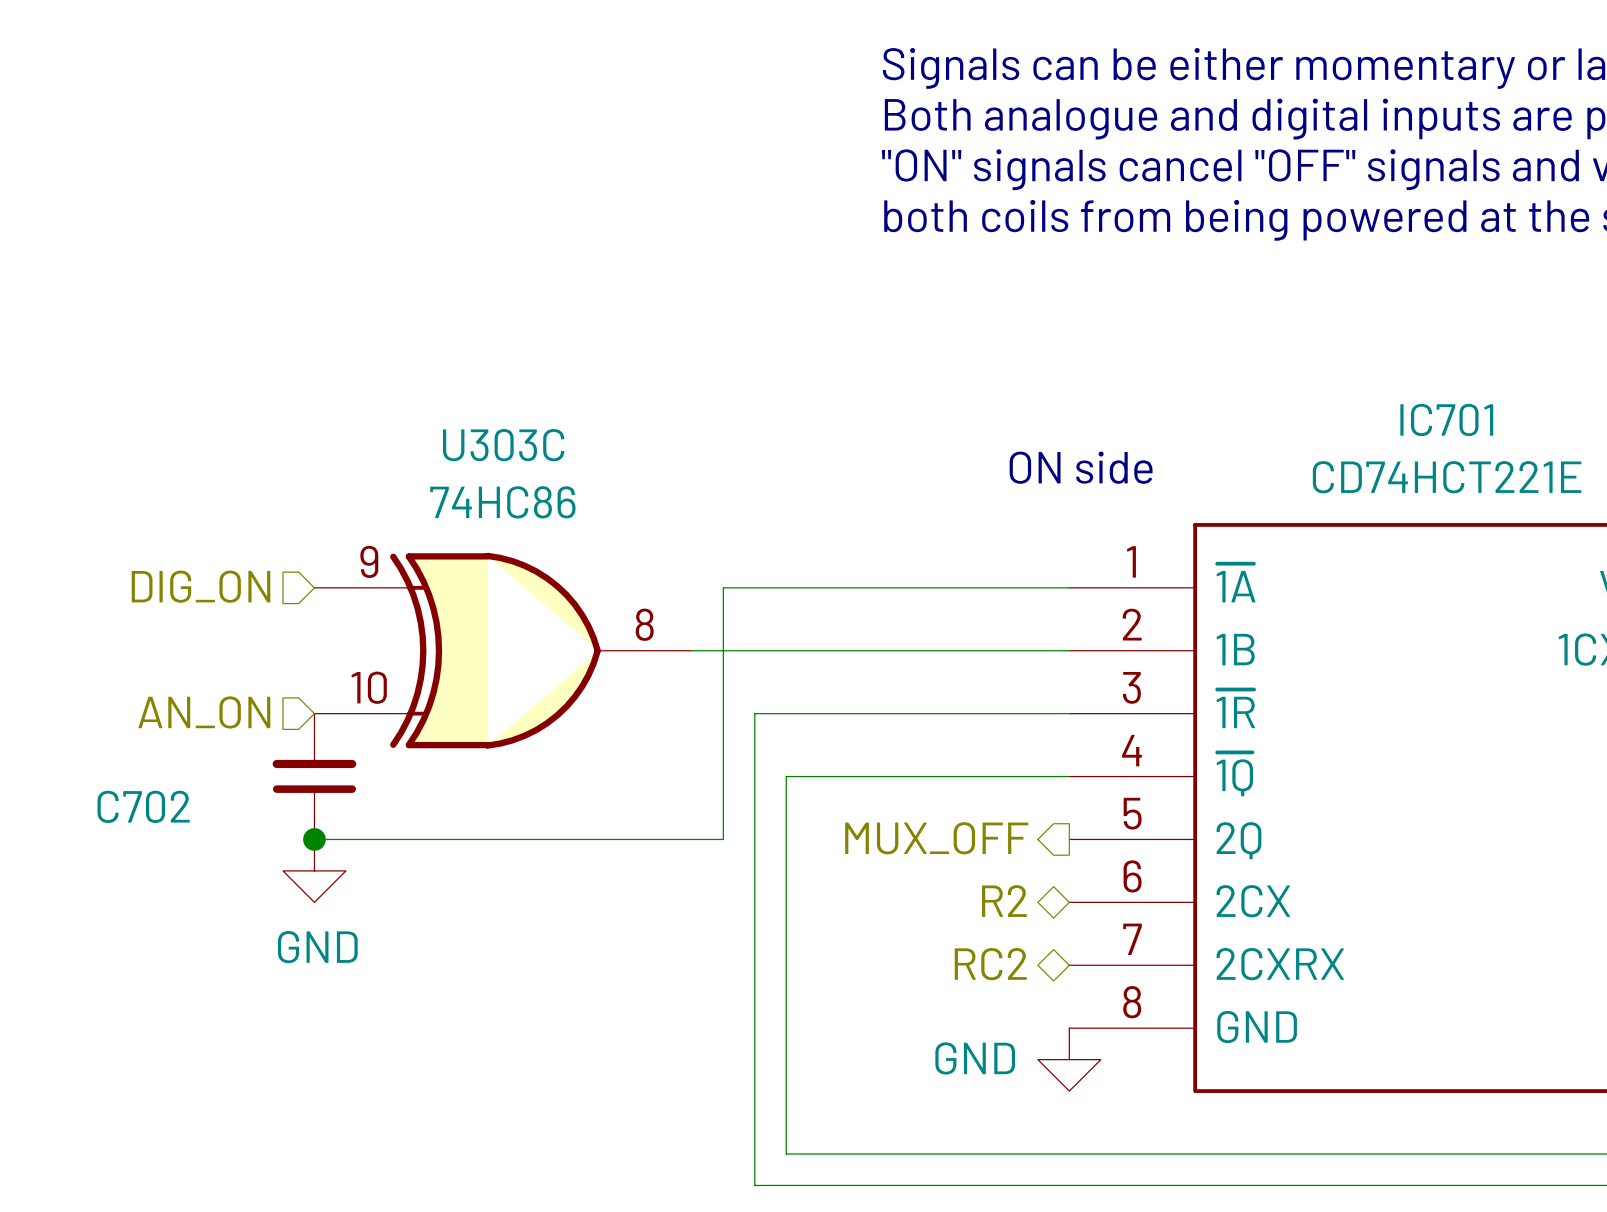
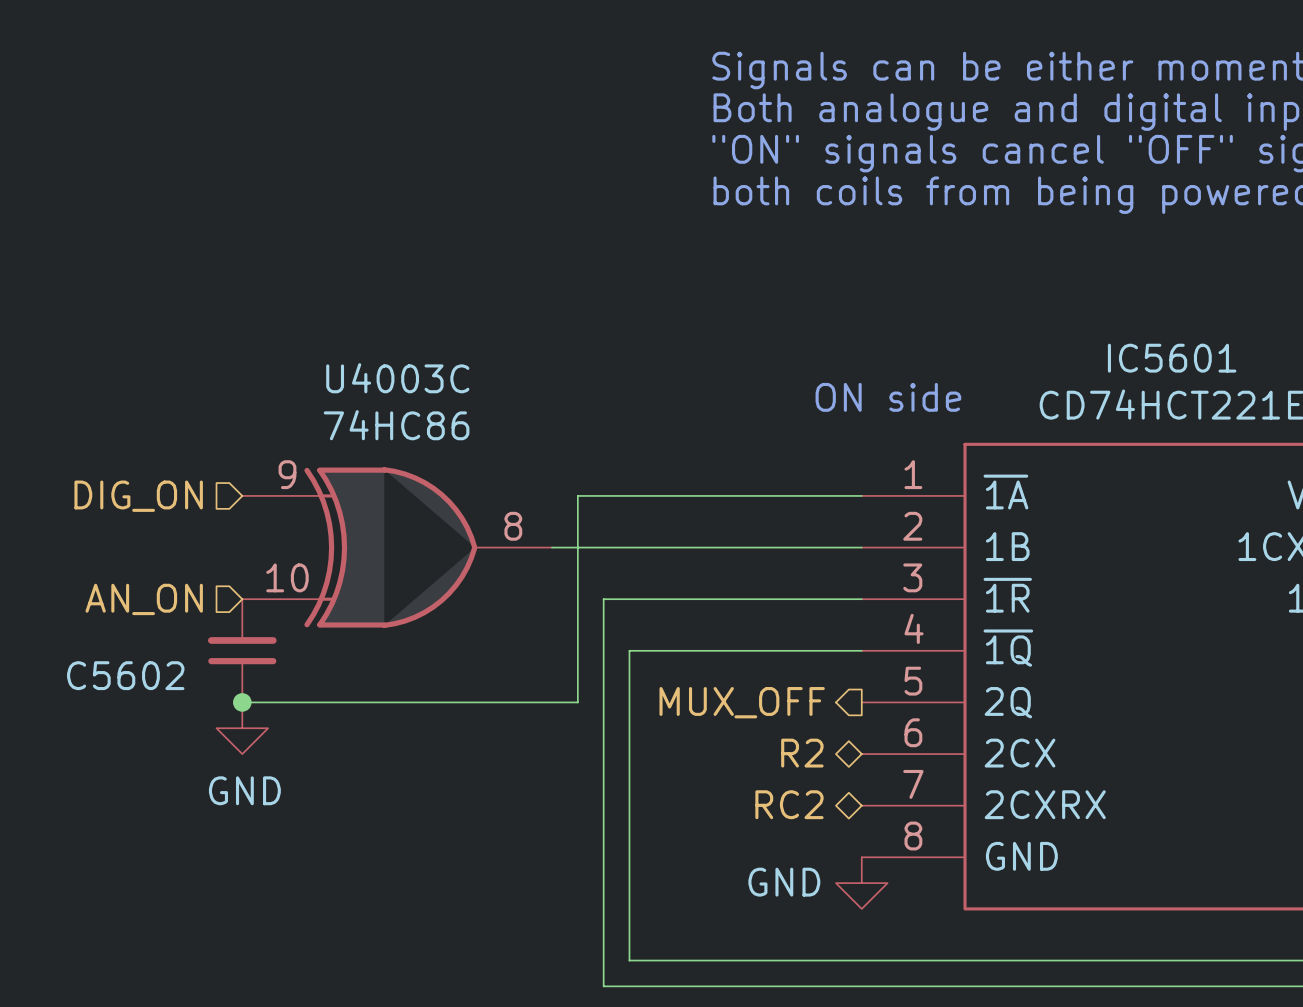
IC701 name: IC701 (1446, 419) -> IC5601 (1172, 358)
U303C name: U303C (503, 445) -> U4003C (397, 378)
C702 name: C702 (143, 806) -> C5602 (125, 675)

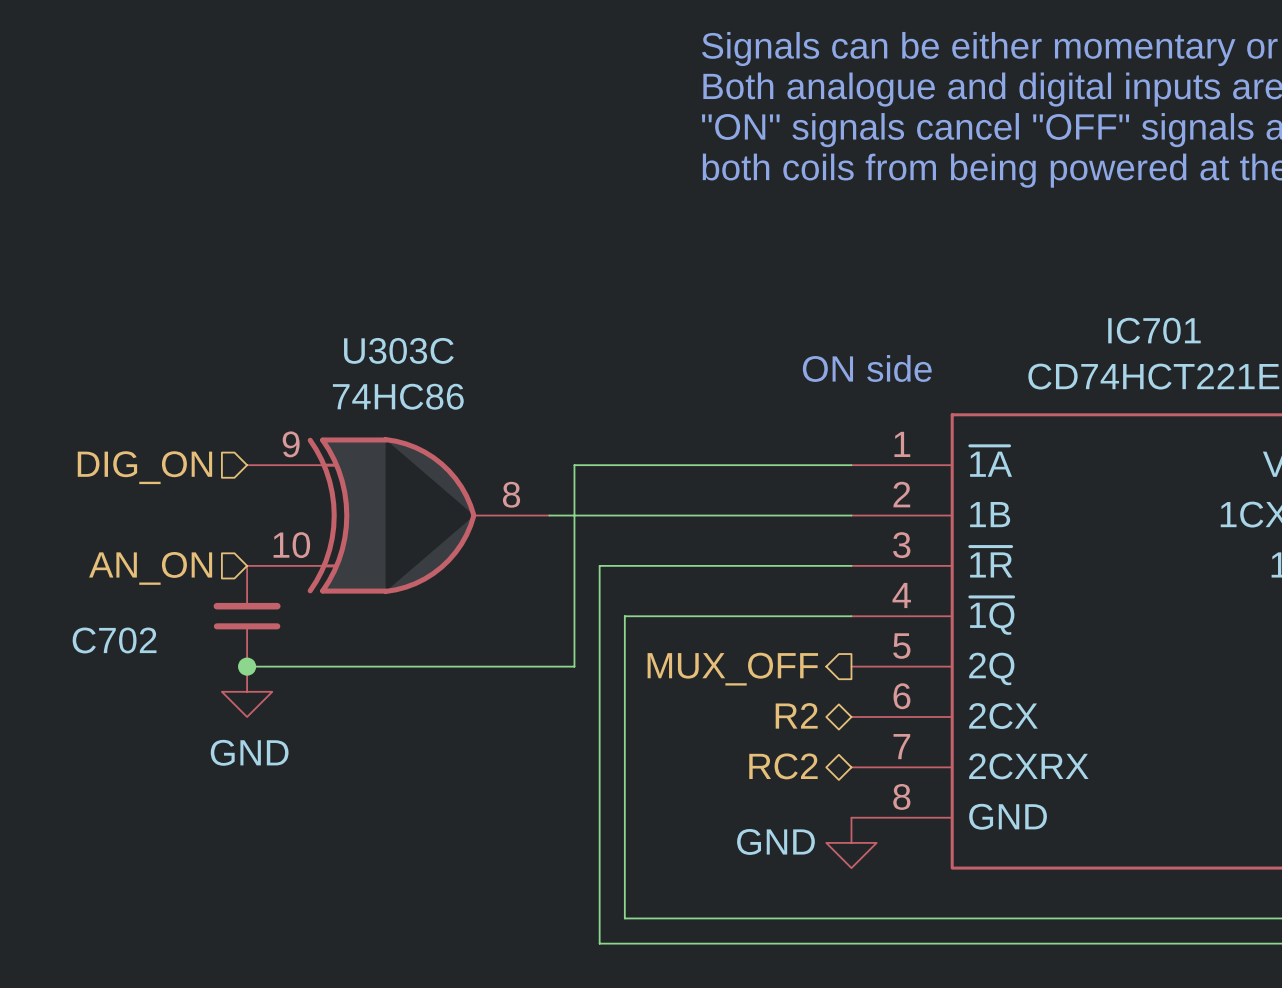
IC5601 name: IC5601 (1172, 358) -> IC701 (1154, 330)
U4003C name: U4003C (397, 378) -> U303C (398, 350)
C5602 name: C5602 (125, 675) -> C702 (114, 640)

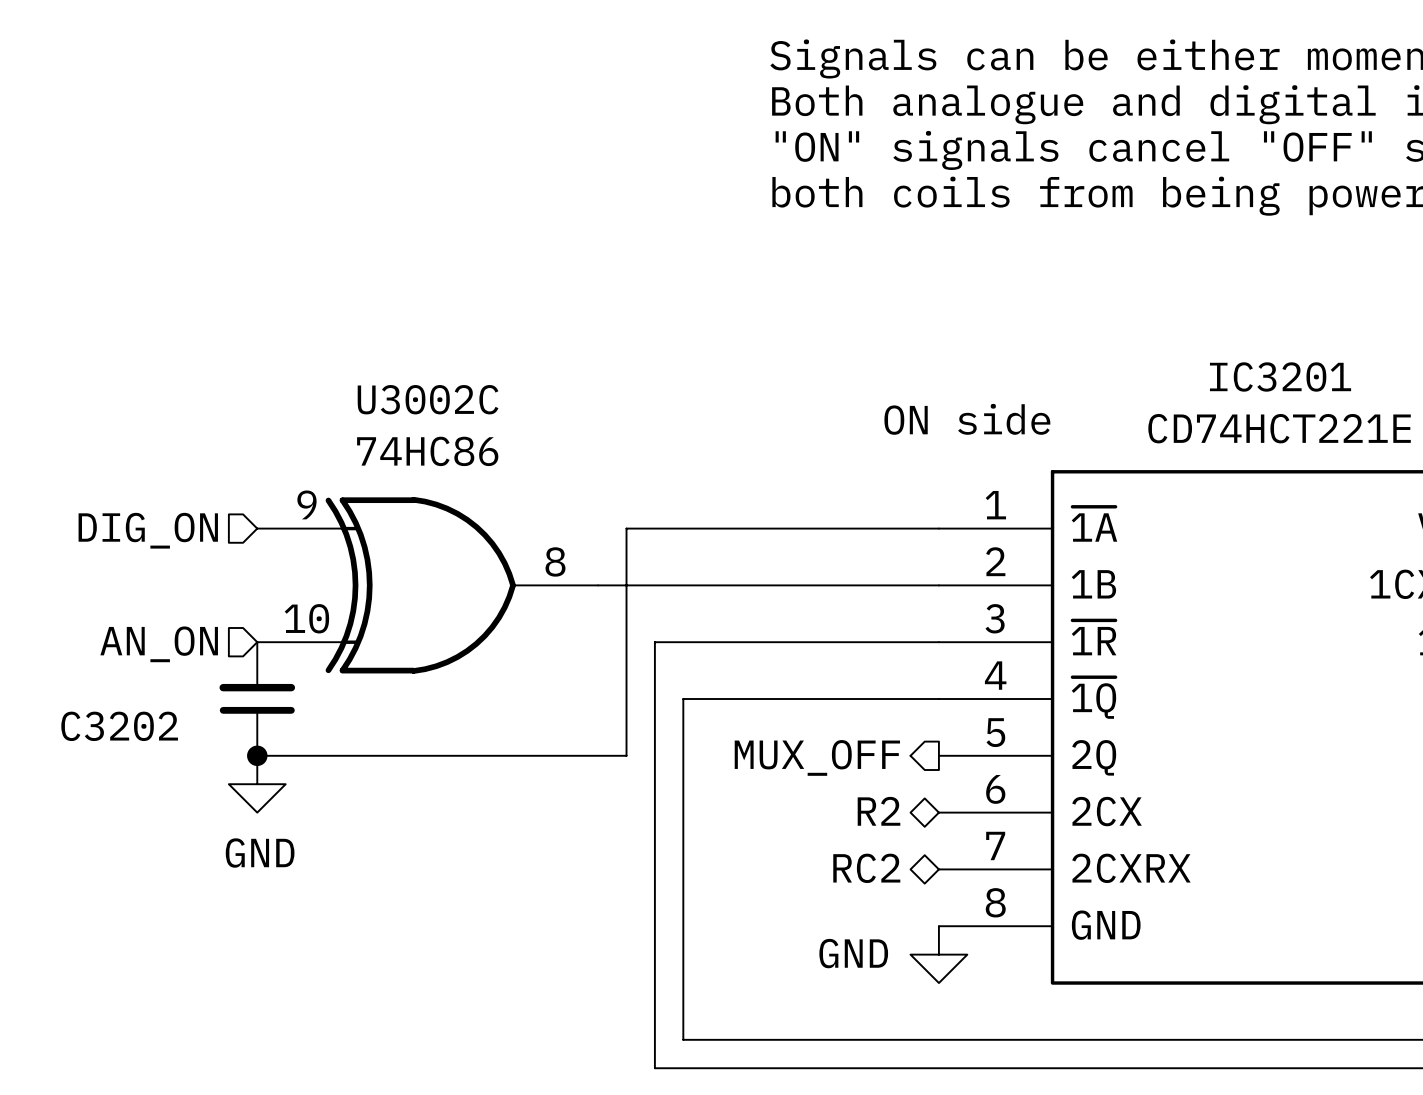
IC701 name: IC701 (1154, 330) -> IC3201 (1280, 376)
U303C name: U303C (398, 350) -> U3002C (428, 399)
C702 name: C702 (114, 640) -> C3202 (119, 726)

